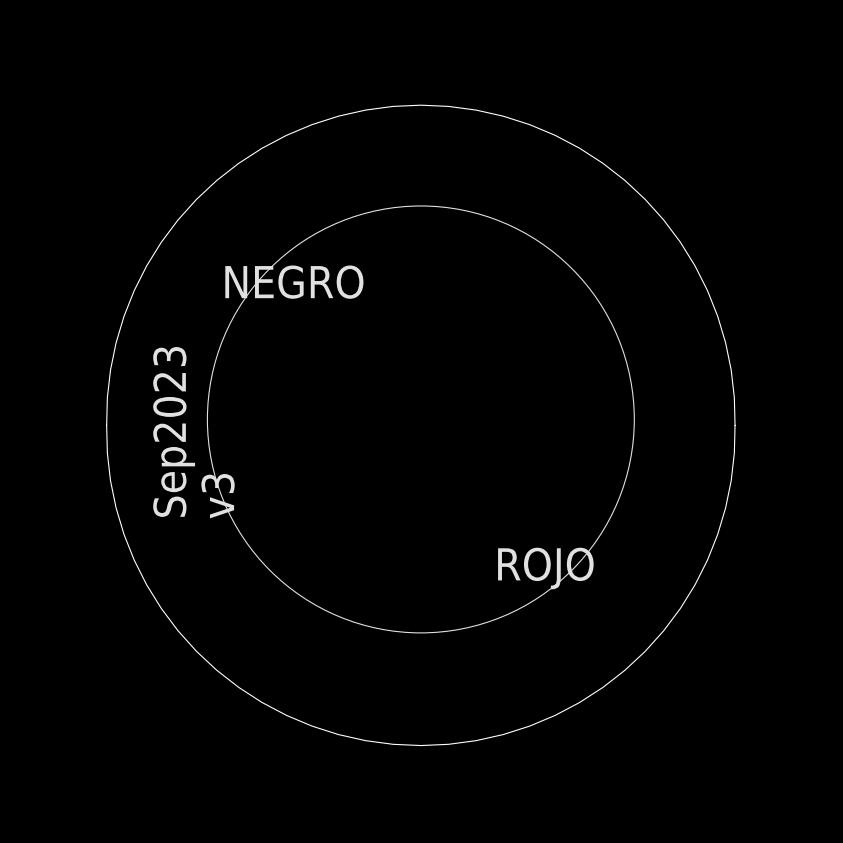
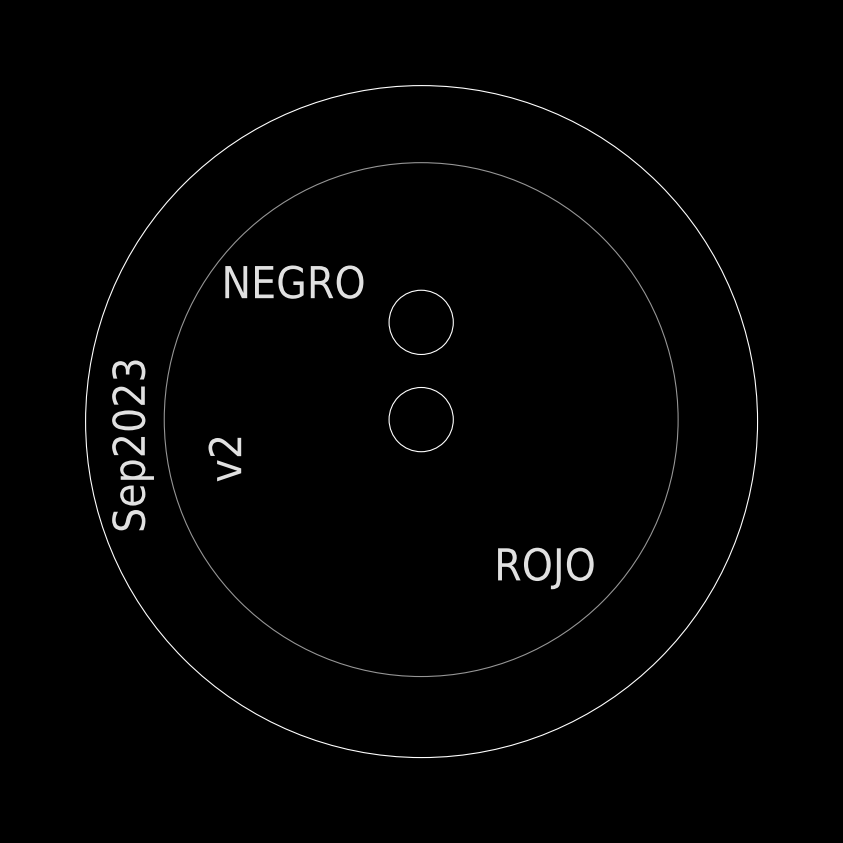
round board edge: none -> [85, 85, 758, 758]
drawing shape: [207, 205, 635, 633] -> [164, 162, 679, 677]
round board edge: none -> [388, 290, 454, 355]
round board edge: none -> [388, 387, 454, 452]
board edge: (106, 425) (110, 370) (124, 316) (146, 265) (178, 219) (196, 199) (216, 180) (262, 148) (312, 124) (365, 110) (420, 105) (476, 110) (529, 124) (579, 148) (624, 180) (645, 199) (663, 219) (694, 265) (717, 316) (731, 370) (735, 425) (731, 480) (717, 534) (694, 584) (663, 630) (645, 651) (624, 670) (579, 702) (529, 726) (476, 740) (420, 745) (365, 740) (312, 726) (262, 702) (216, 670) (196, 651) (178, 630) (146, 584) (124, 534) (110, 480) (106, 425) -> none
text position: Sep2023 (174, 431) -> Sep2023 (133, 445)
text: v3 (218, 496) -> v2 (224, 459)

